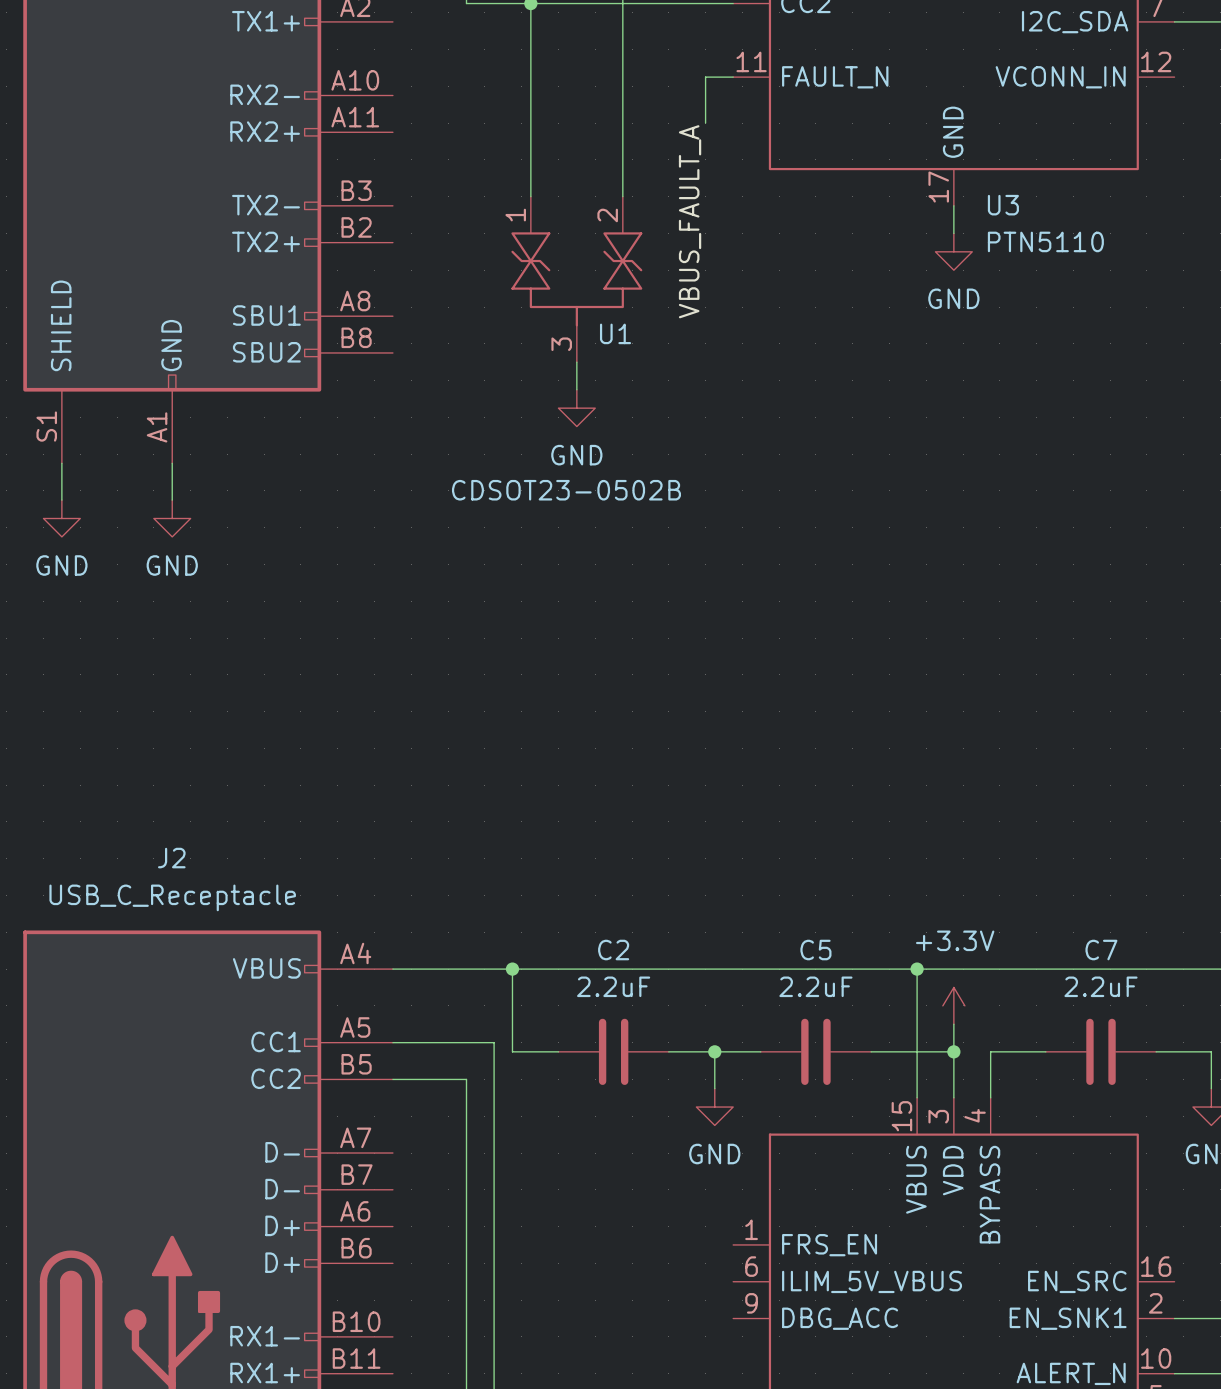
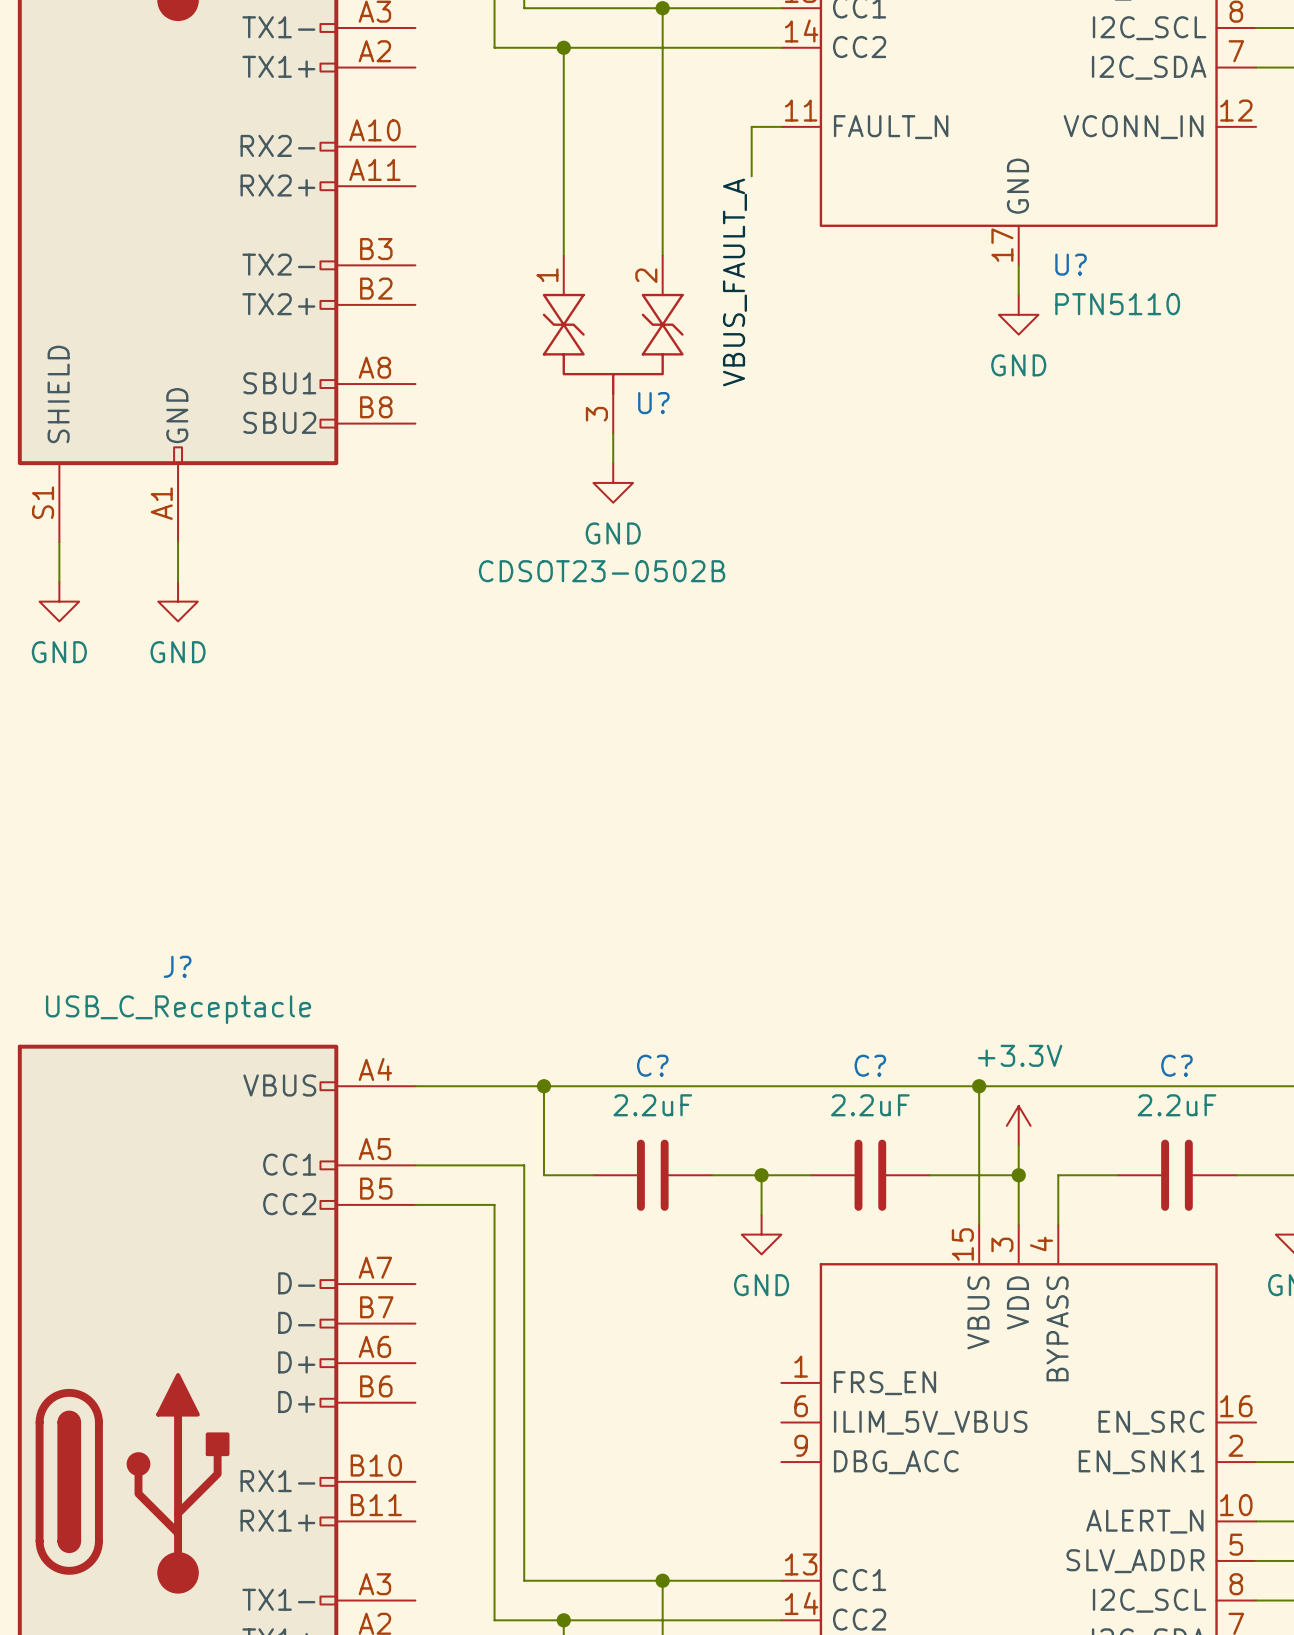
U3 name: U3 (1003, 205) -> U? (1071, 264)
U1 name: U1 (615, 333) -> U? (653, 403)
J2 name: J2 (171, 858) -> J? (177, 966)
C2 name: C2 (613, 950) -> C? (652, 1065)
C5 name: C5 (815, 950) -> C? (870, 1065)
C7 name: C7 (1101, 950) -> C? (1176, 1065)

